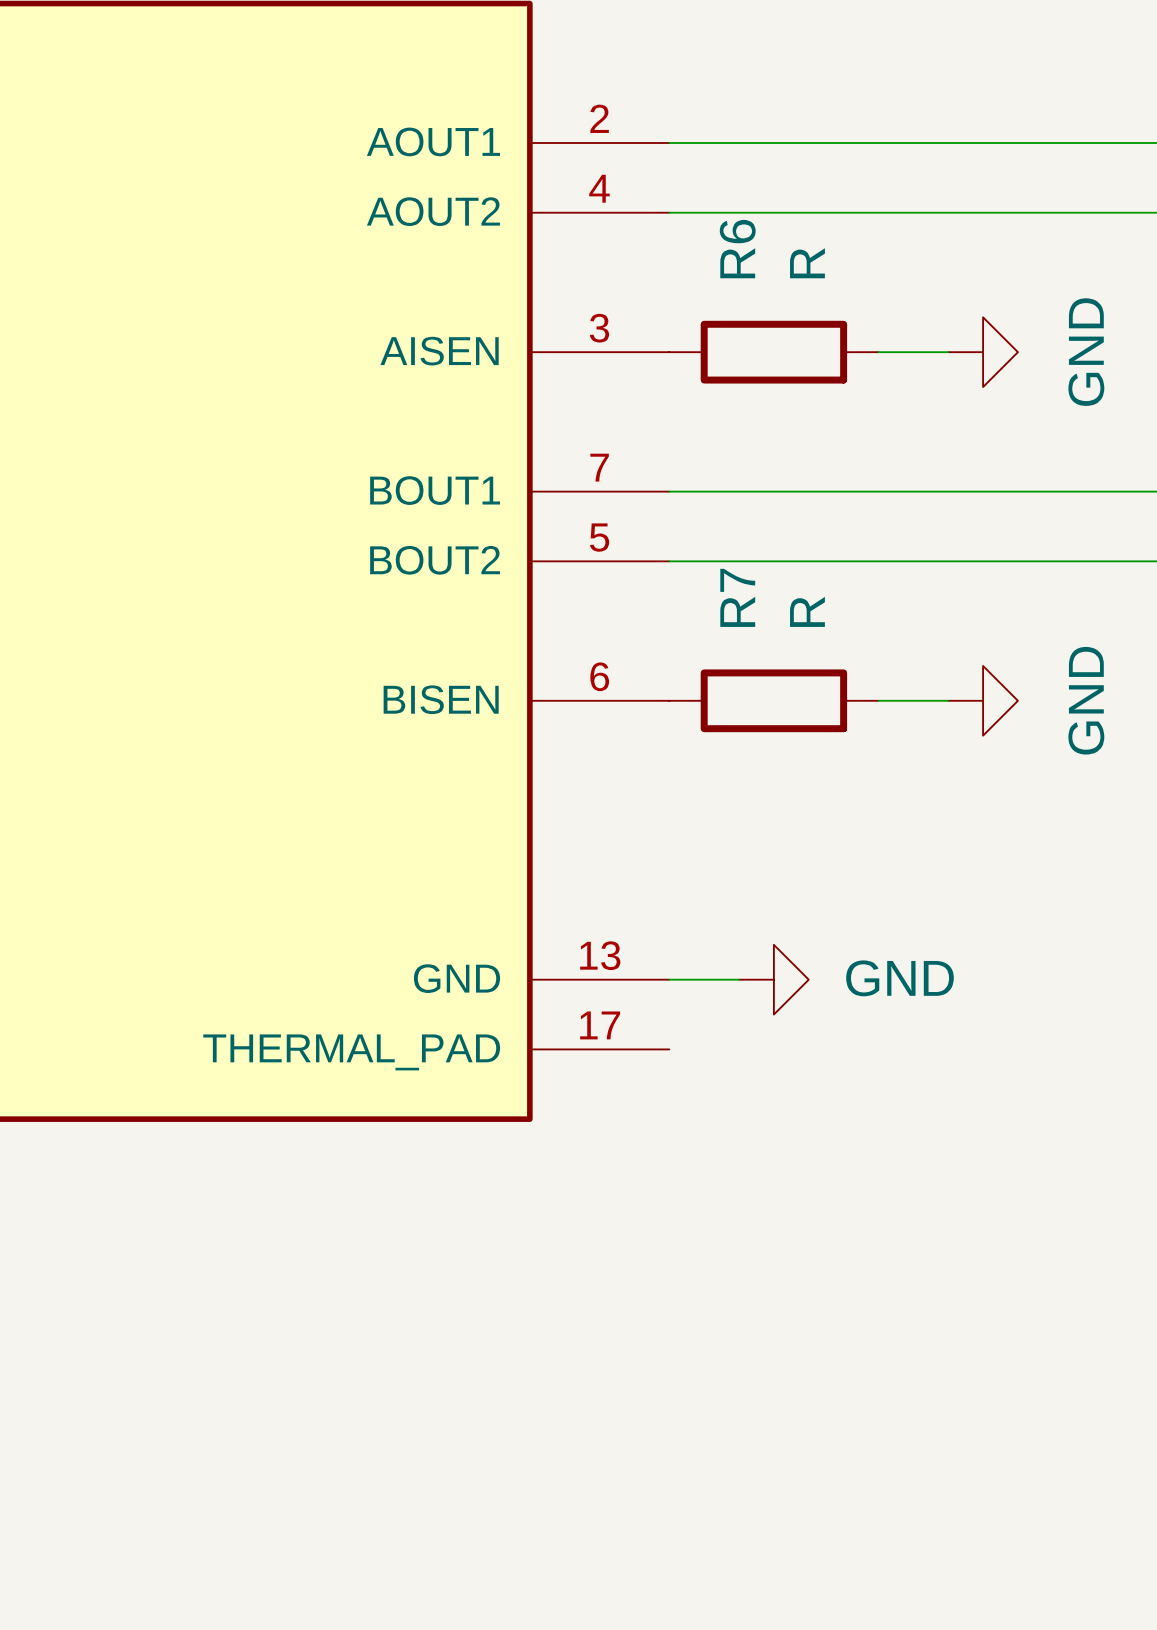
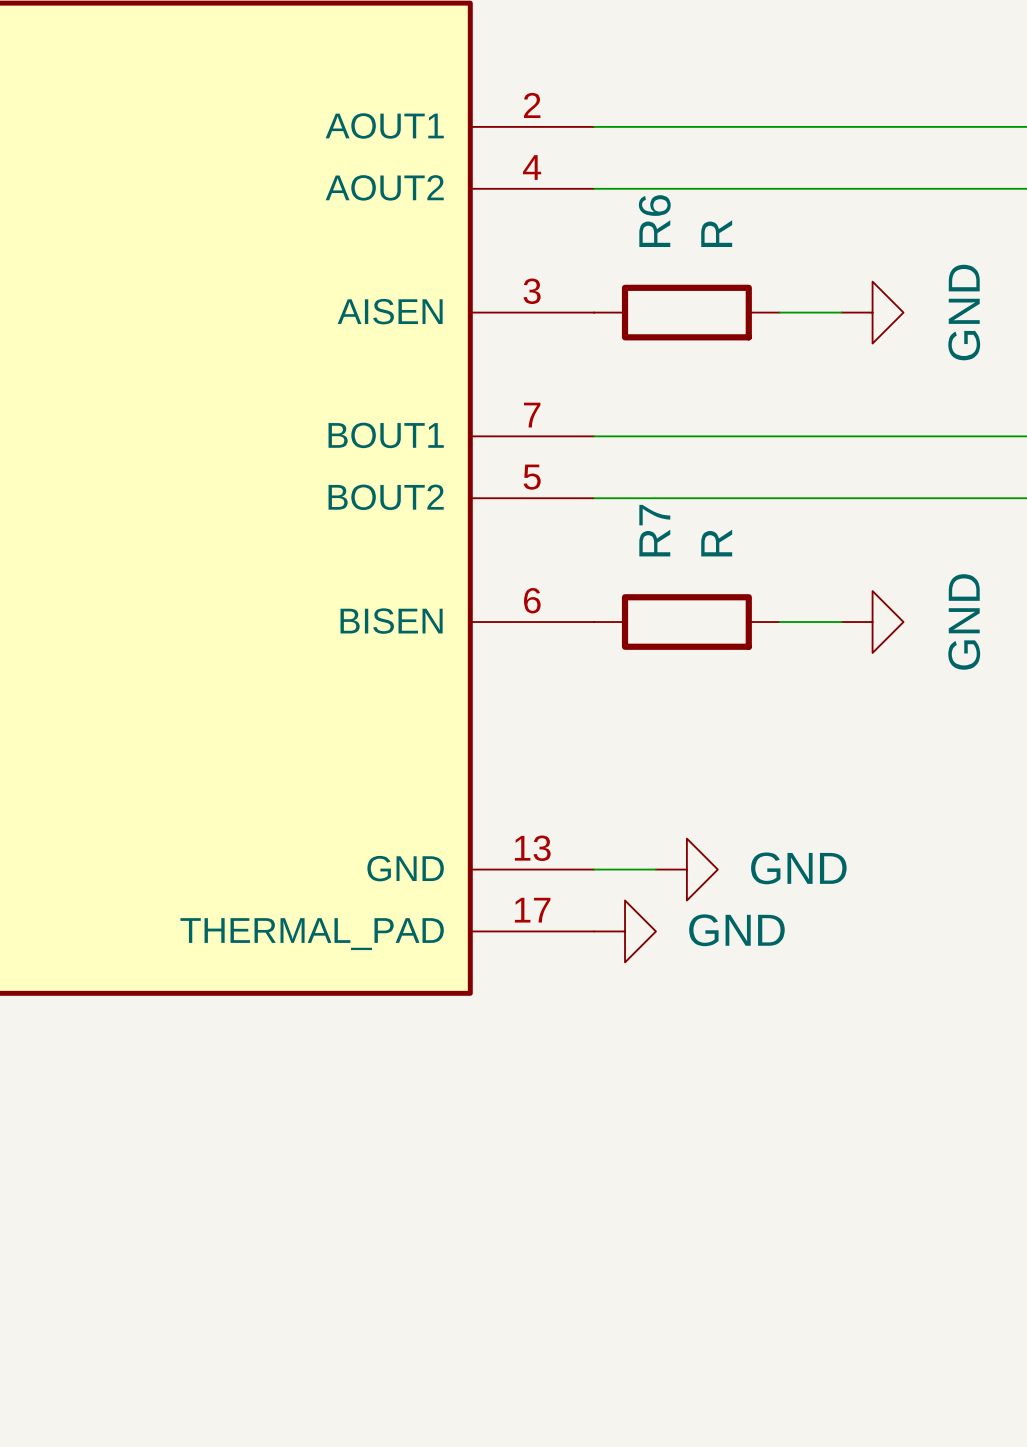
power symbol: none -> GND (625, 931)

